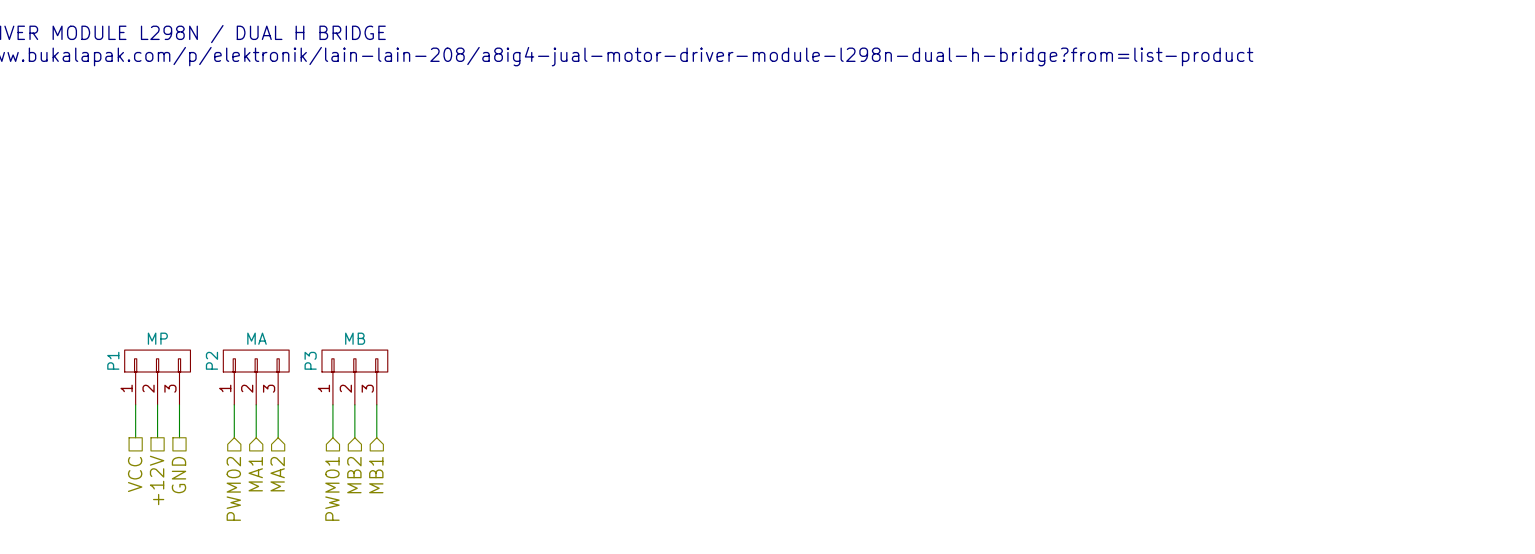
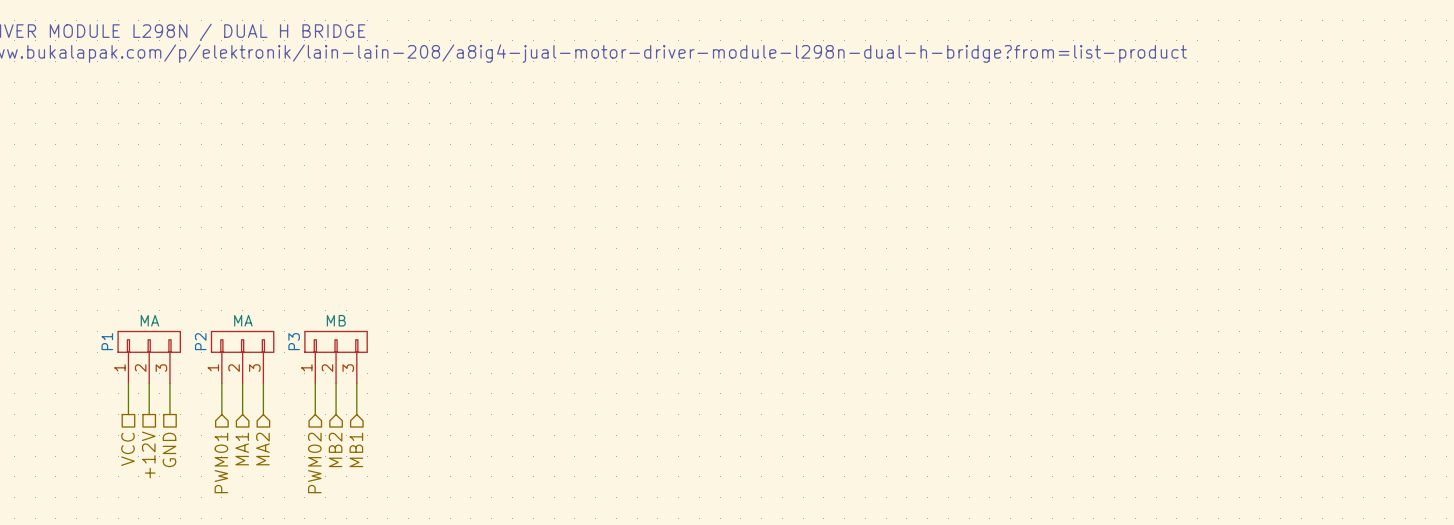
P1 value: MP (157, 338) -> MA (149, 320)
hierarchical label: PWM02 (233, 488) -> PWM01 (221, 462)
hierarchical label: PWM01 (332, 488) -> PWM02 (314, 462)

